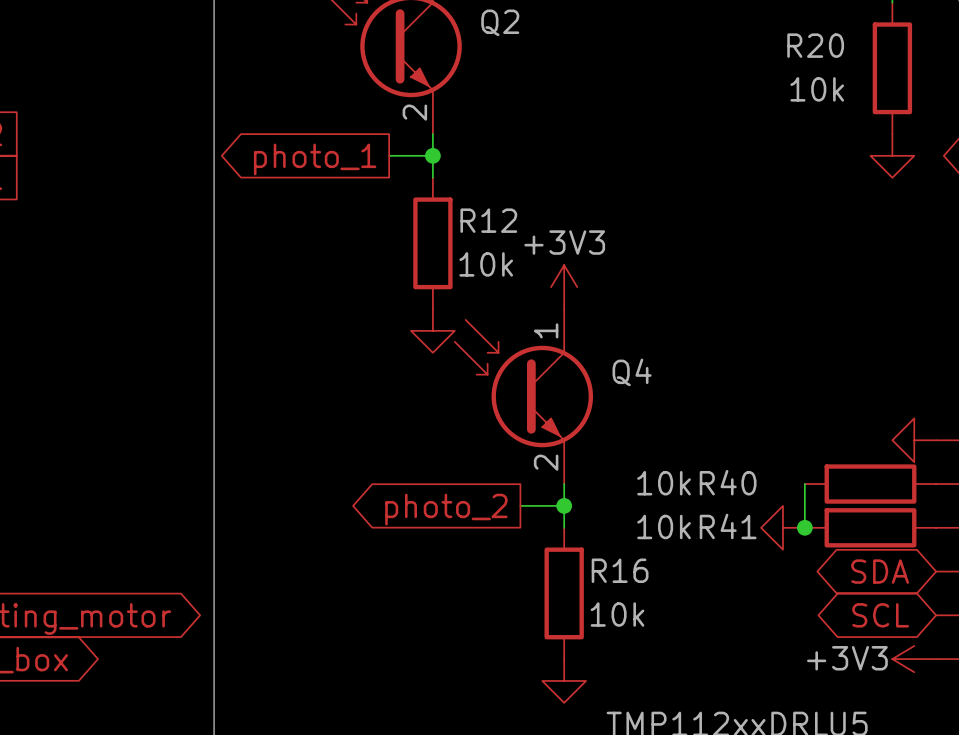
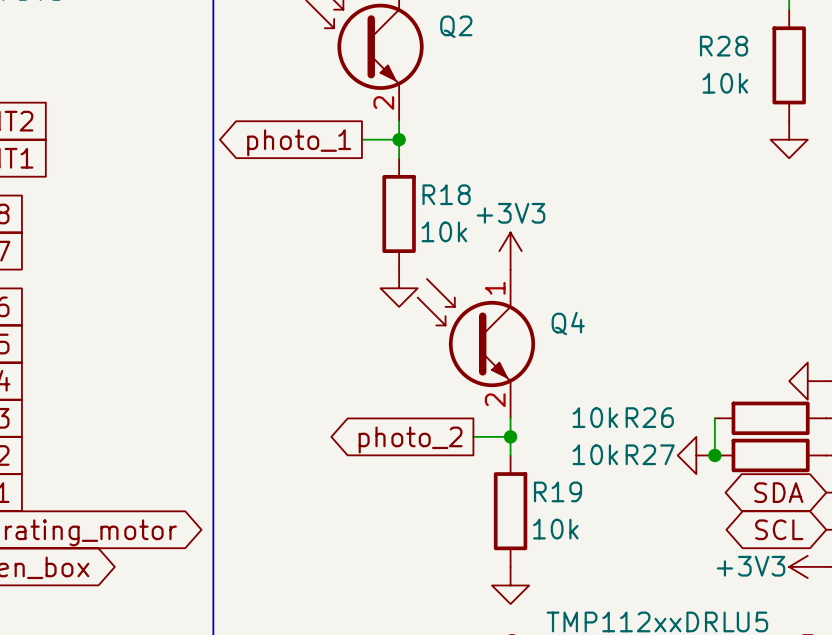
R20 name: R20 (815, 45) -> R28 (724, 46)
R12 name: R12 (488, 220) -> R18 (446, 194)
R40 name: R40 (728, 482) -> R26 (649, 417)
R41 name: R41 (728, 526) -> R27 (650, 454)
R16 name: R16 (620, 570) -> R19 (558, 491)

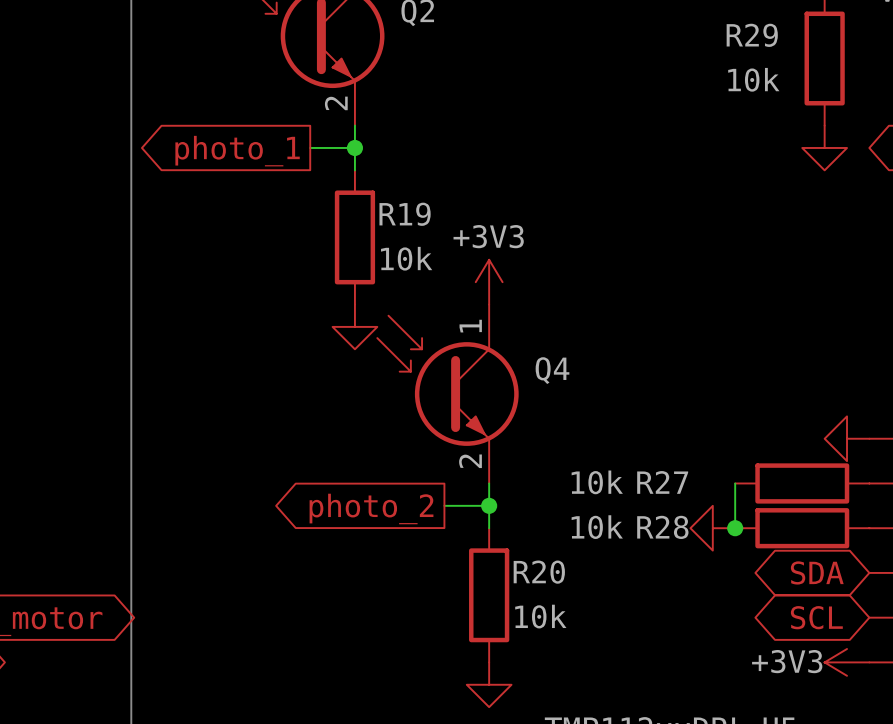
R28 name: R28 (724, 46) -> R29 (752, 35)
R18 name: R18 (446, 194) -> R19 (405, 214)
R26 name: R26 (649, 417) -> R27 (662, 482)
R27 name: R27 (650, 454) -> R28 (662, 527)
R19 name: R19 (558, 491) -> R20 (539, 572)

